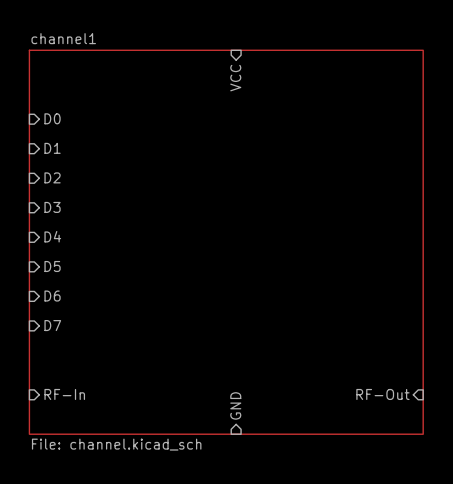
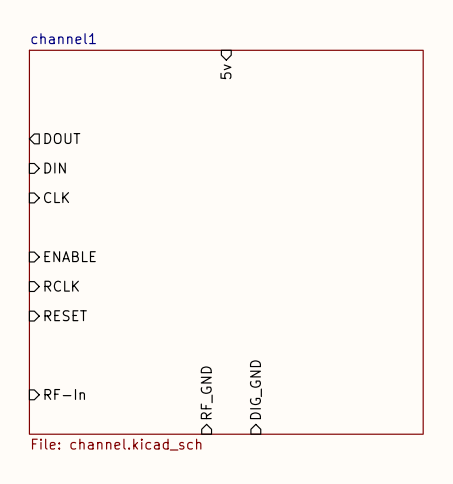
sheet pin: none -> 5v (225, 71)
sheet pin: VCC (235, 78) -> none
sheet pin: D0 (52, 118) -> none
sheet pin: none -> DOUT (62, 138)
sheet pin: D1 (52, 148) -> none
sheet pin: none -> DIN (55, 168)
sheet pin: D2 (52, 177) -> none
sheet pin: none -> CLK (56, 197)
sheet pin: D3 (52, 207) -> none
sheet pin: D4 (52, 236) -> none
sheet pin: none -> ENABLE (70, 256)
sheet pin: D5 (52, 266) -> none
sheet pin: none -> RCLK (61, 286)
sheet pin: D6 (52, 296) -> none
sheet pin: none -> RESET (65, 315)
sheet pin: D7 (52, 325) -> none
sheet pin: none -> DIG_GND (255, 389)
sheet pin: none -> RF_GND (206, 392)
sheet pin: RF-Out (382, 394) -> none
sheet pin: GND (235, 405) -> none

